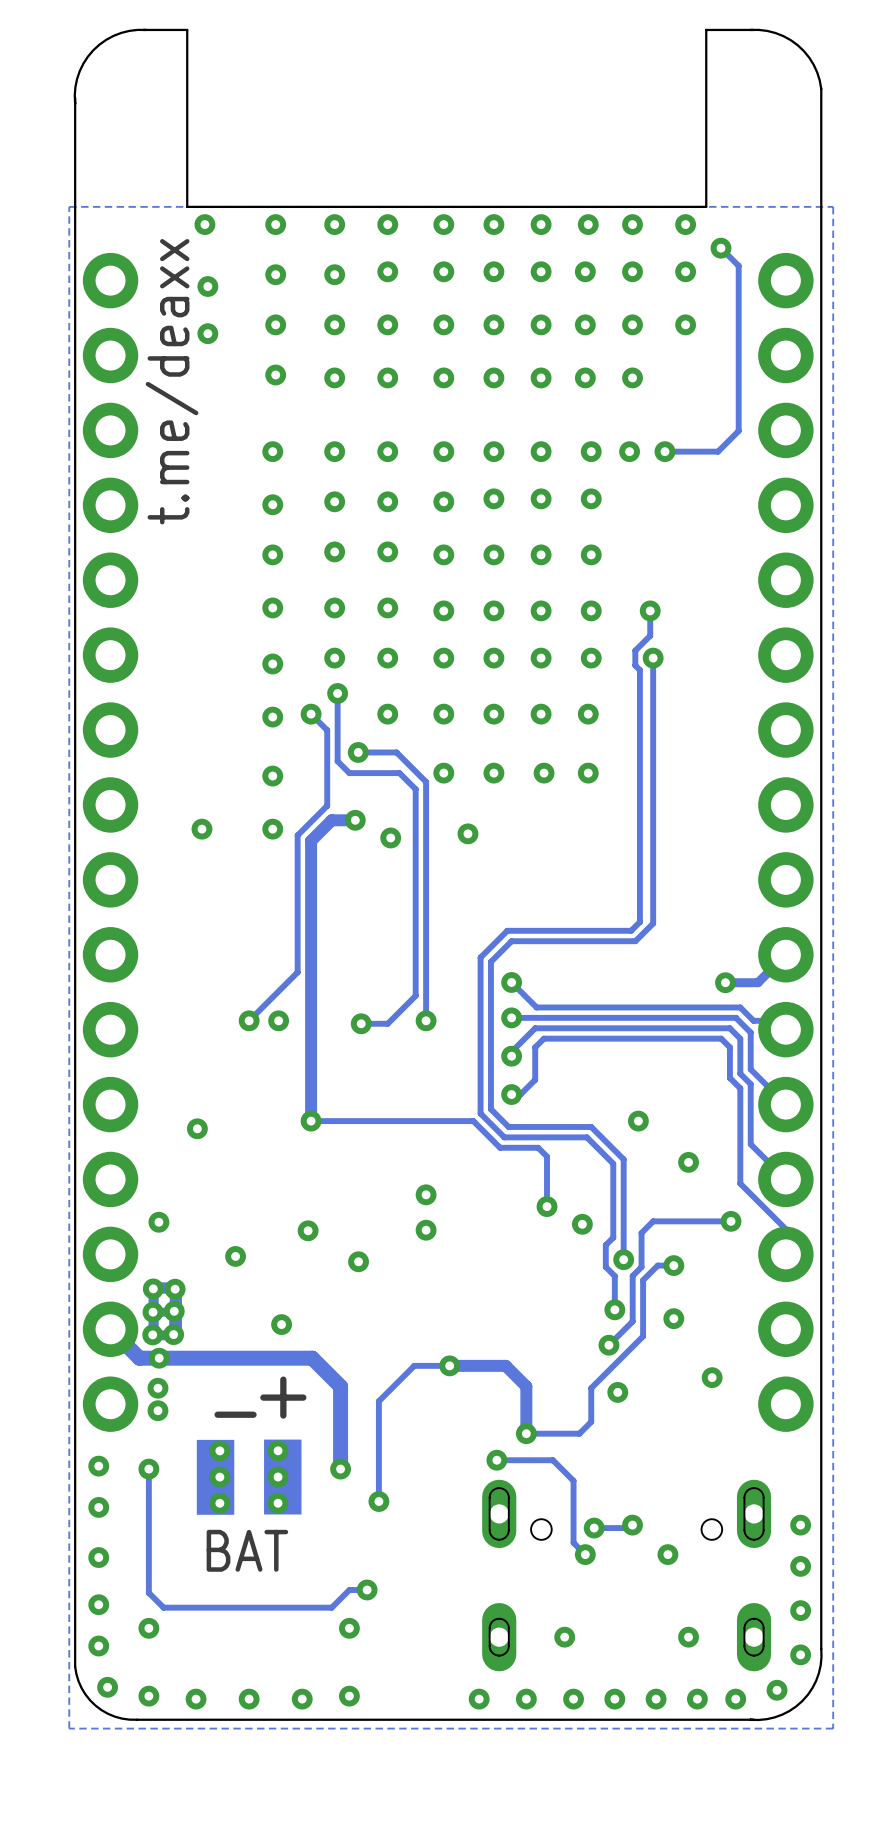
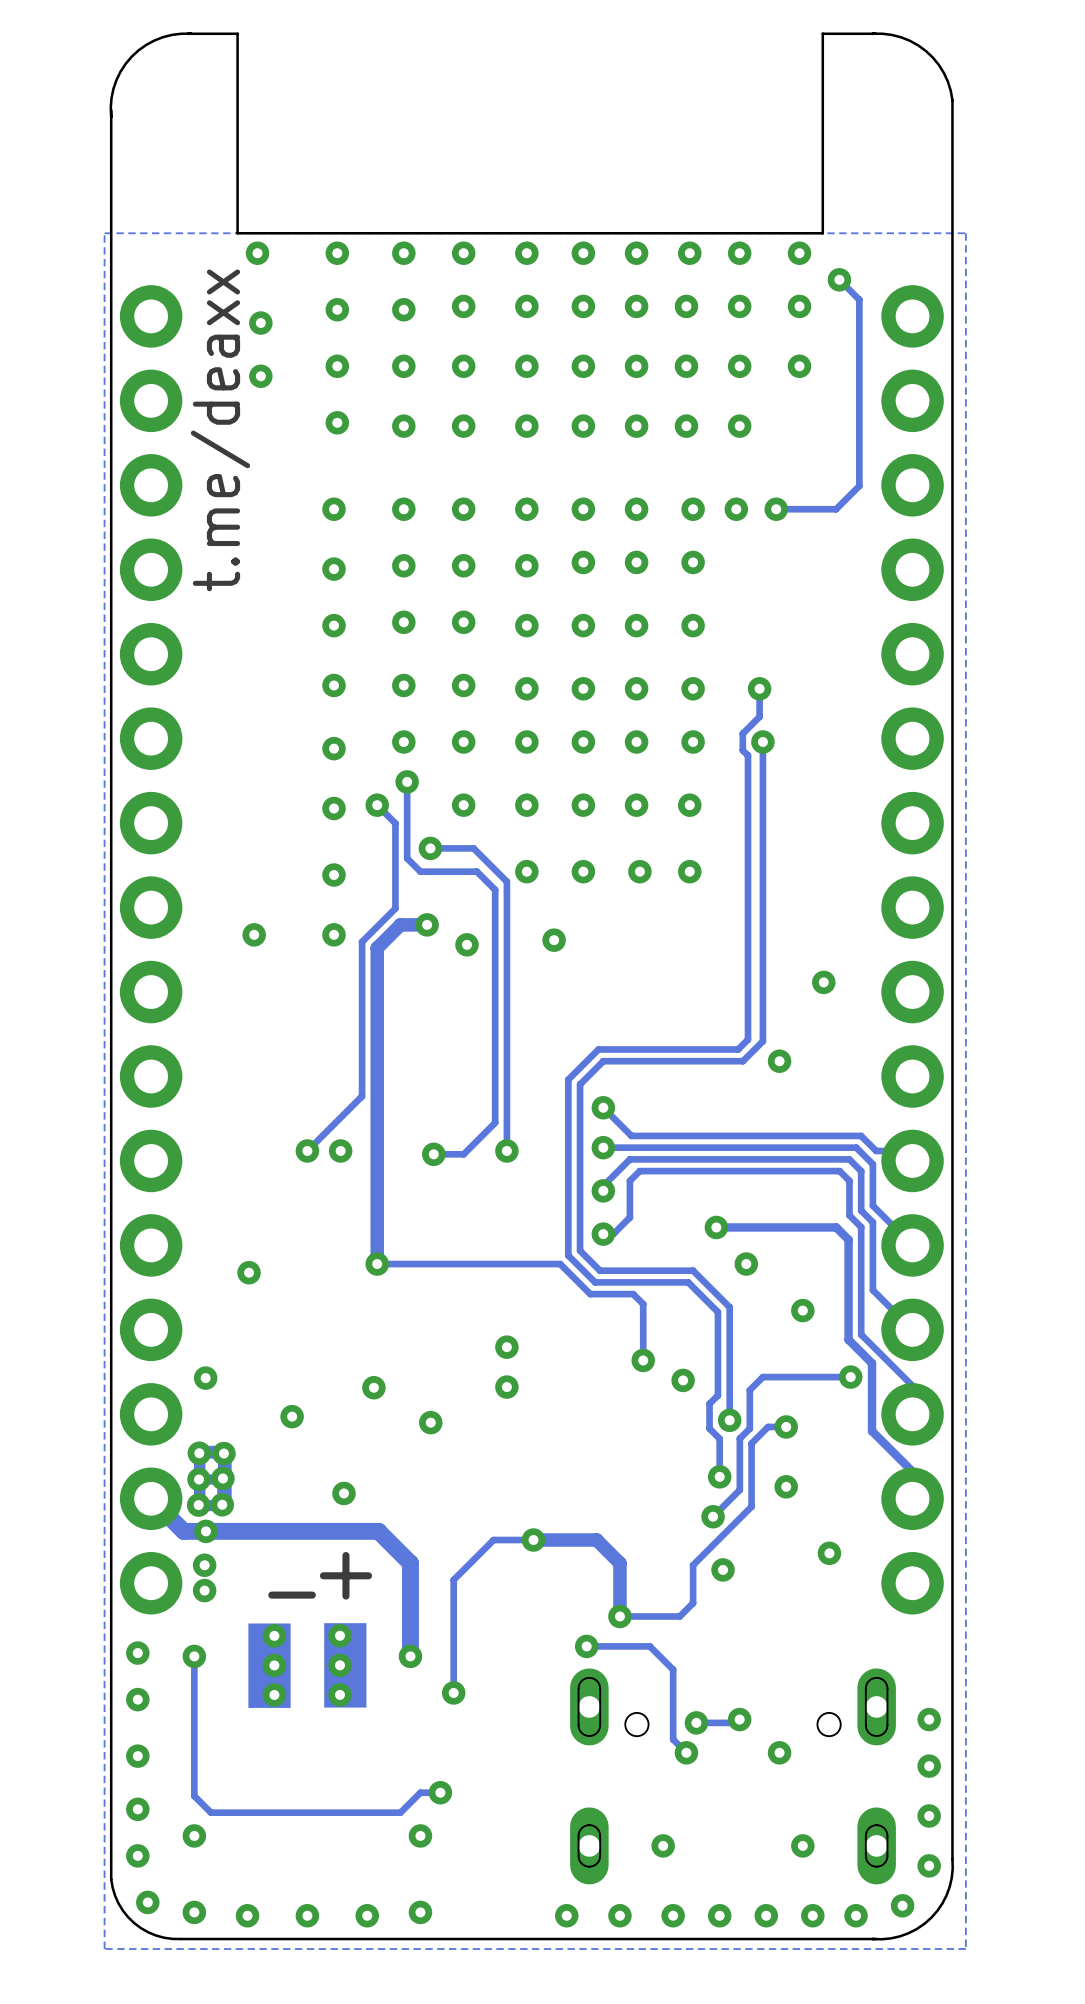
via: none -> (823, 982)
via: none -> (779, 1061)
track: (785, 954) (757, 982) (725, 982) -> none
via: (725, 982) -> none
track: none -> (716, 1227) (836, 1227) (848, 1239) (848, 1339) (872, 1363) (872, 1431) (912, 1471) (912, 1498)
via: none -> (716, 1227)
text: BAT (247, 1550) -> none

